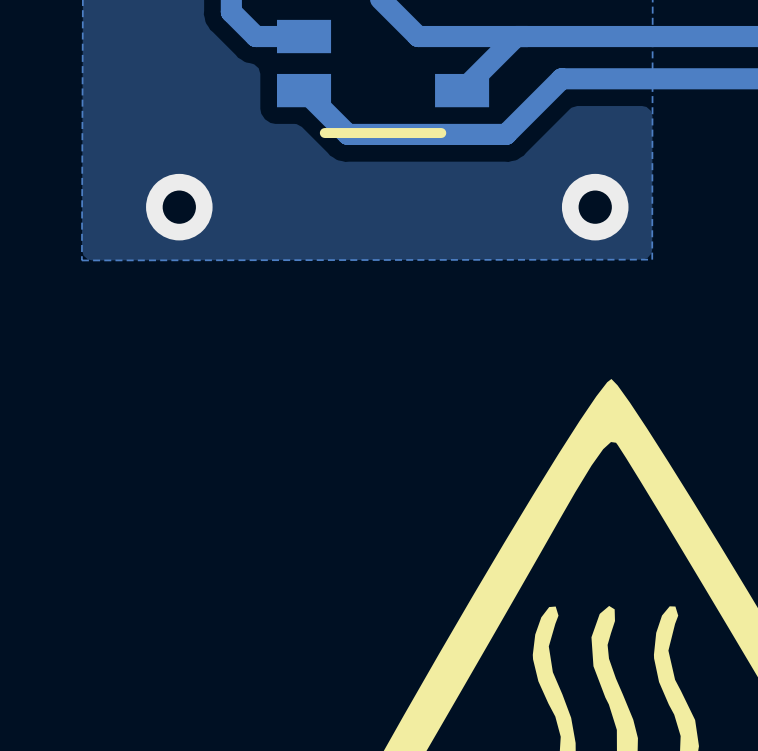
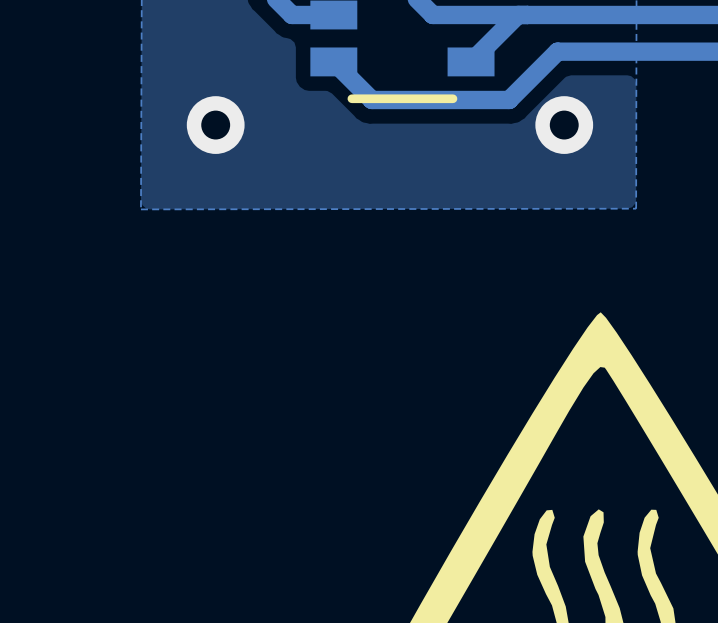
via position: (179, 207) -> (215, 125)
via position: (595, 207) -> (564, 125)

